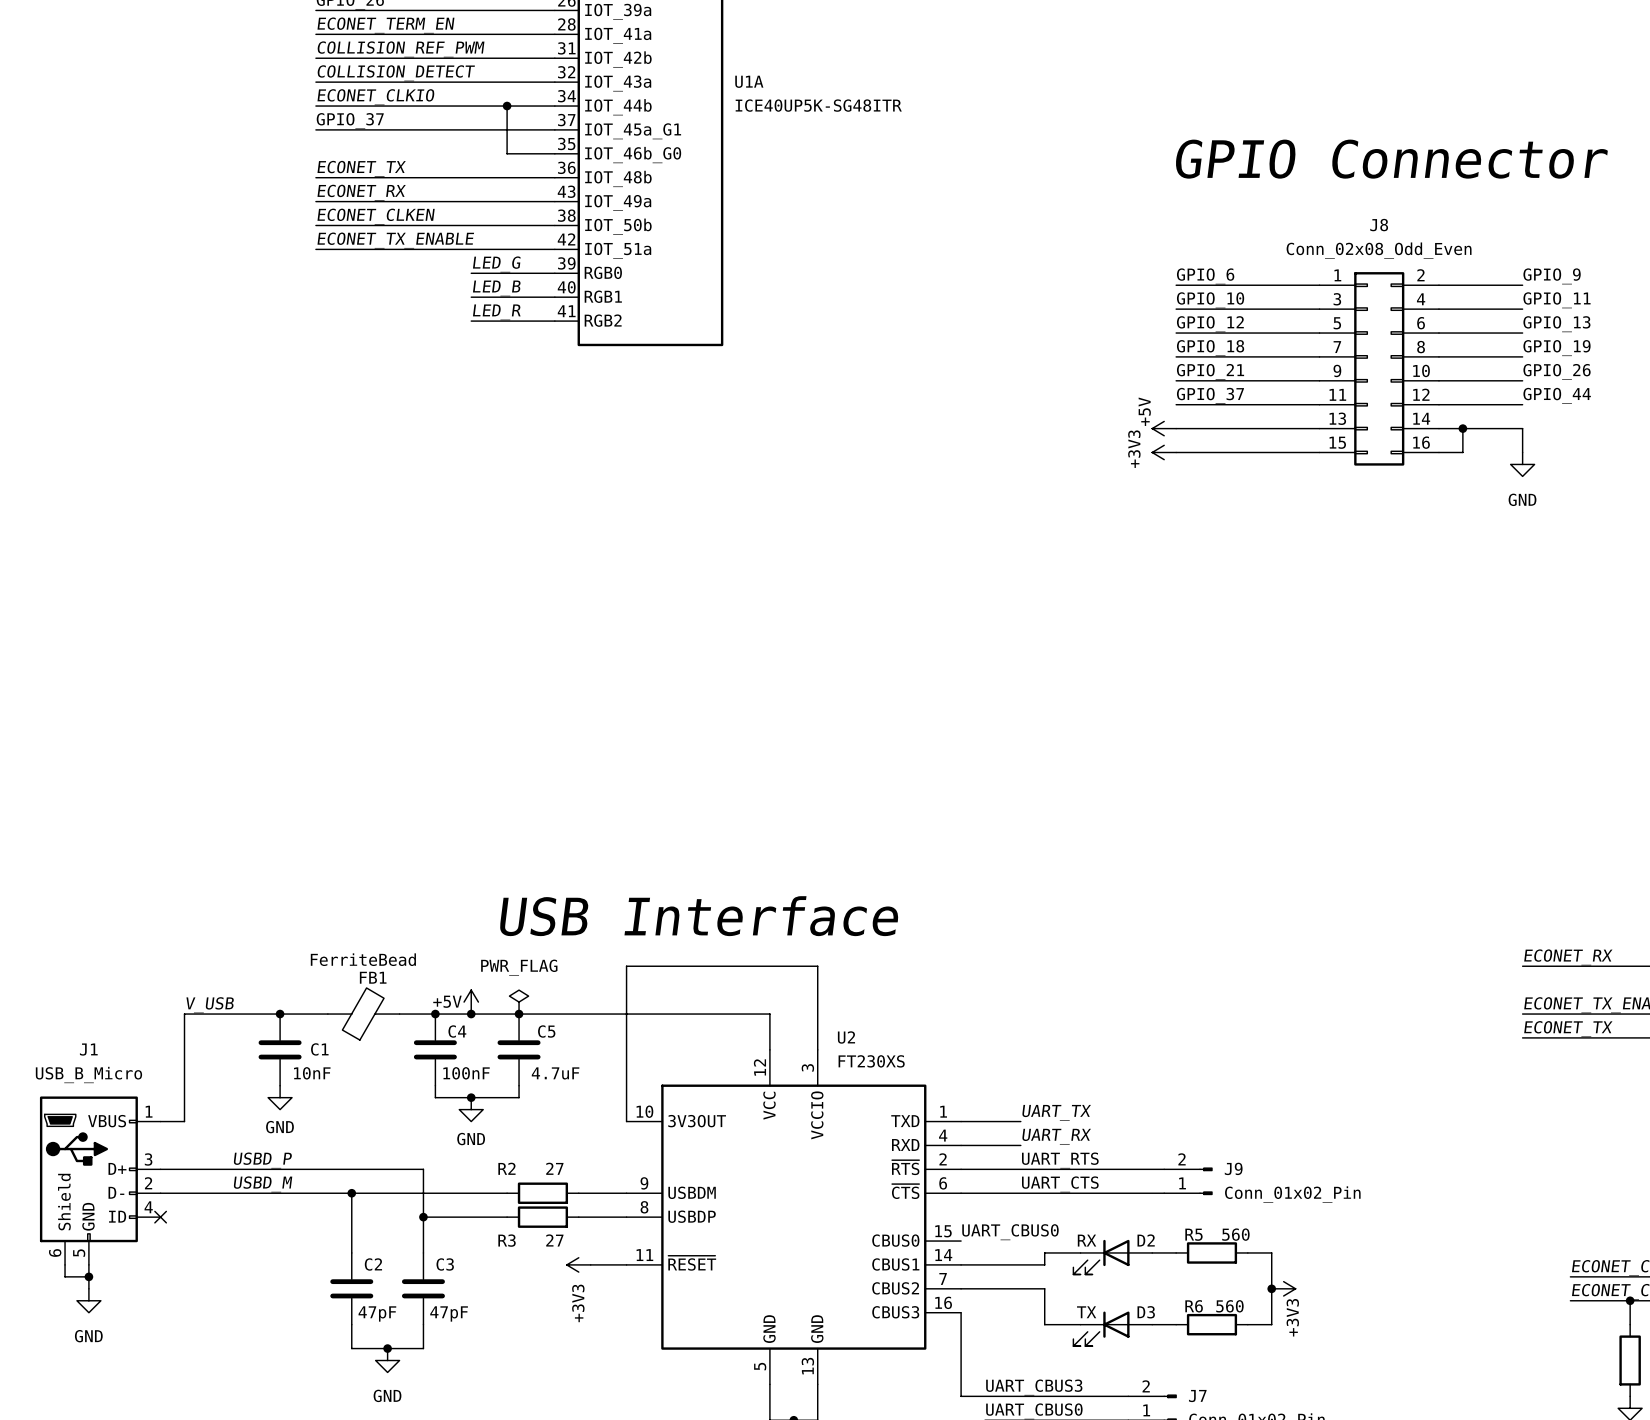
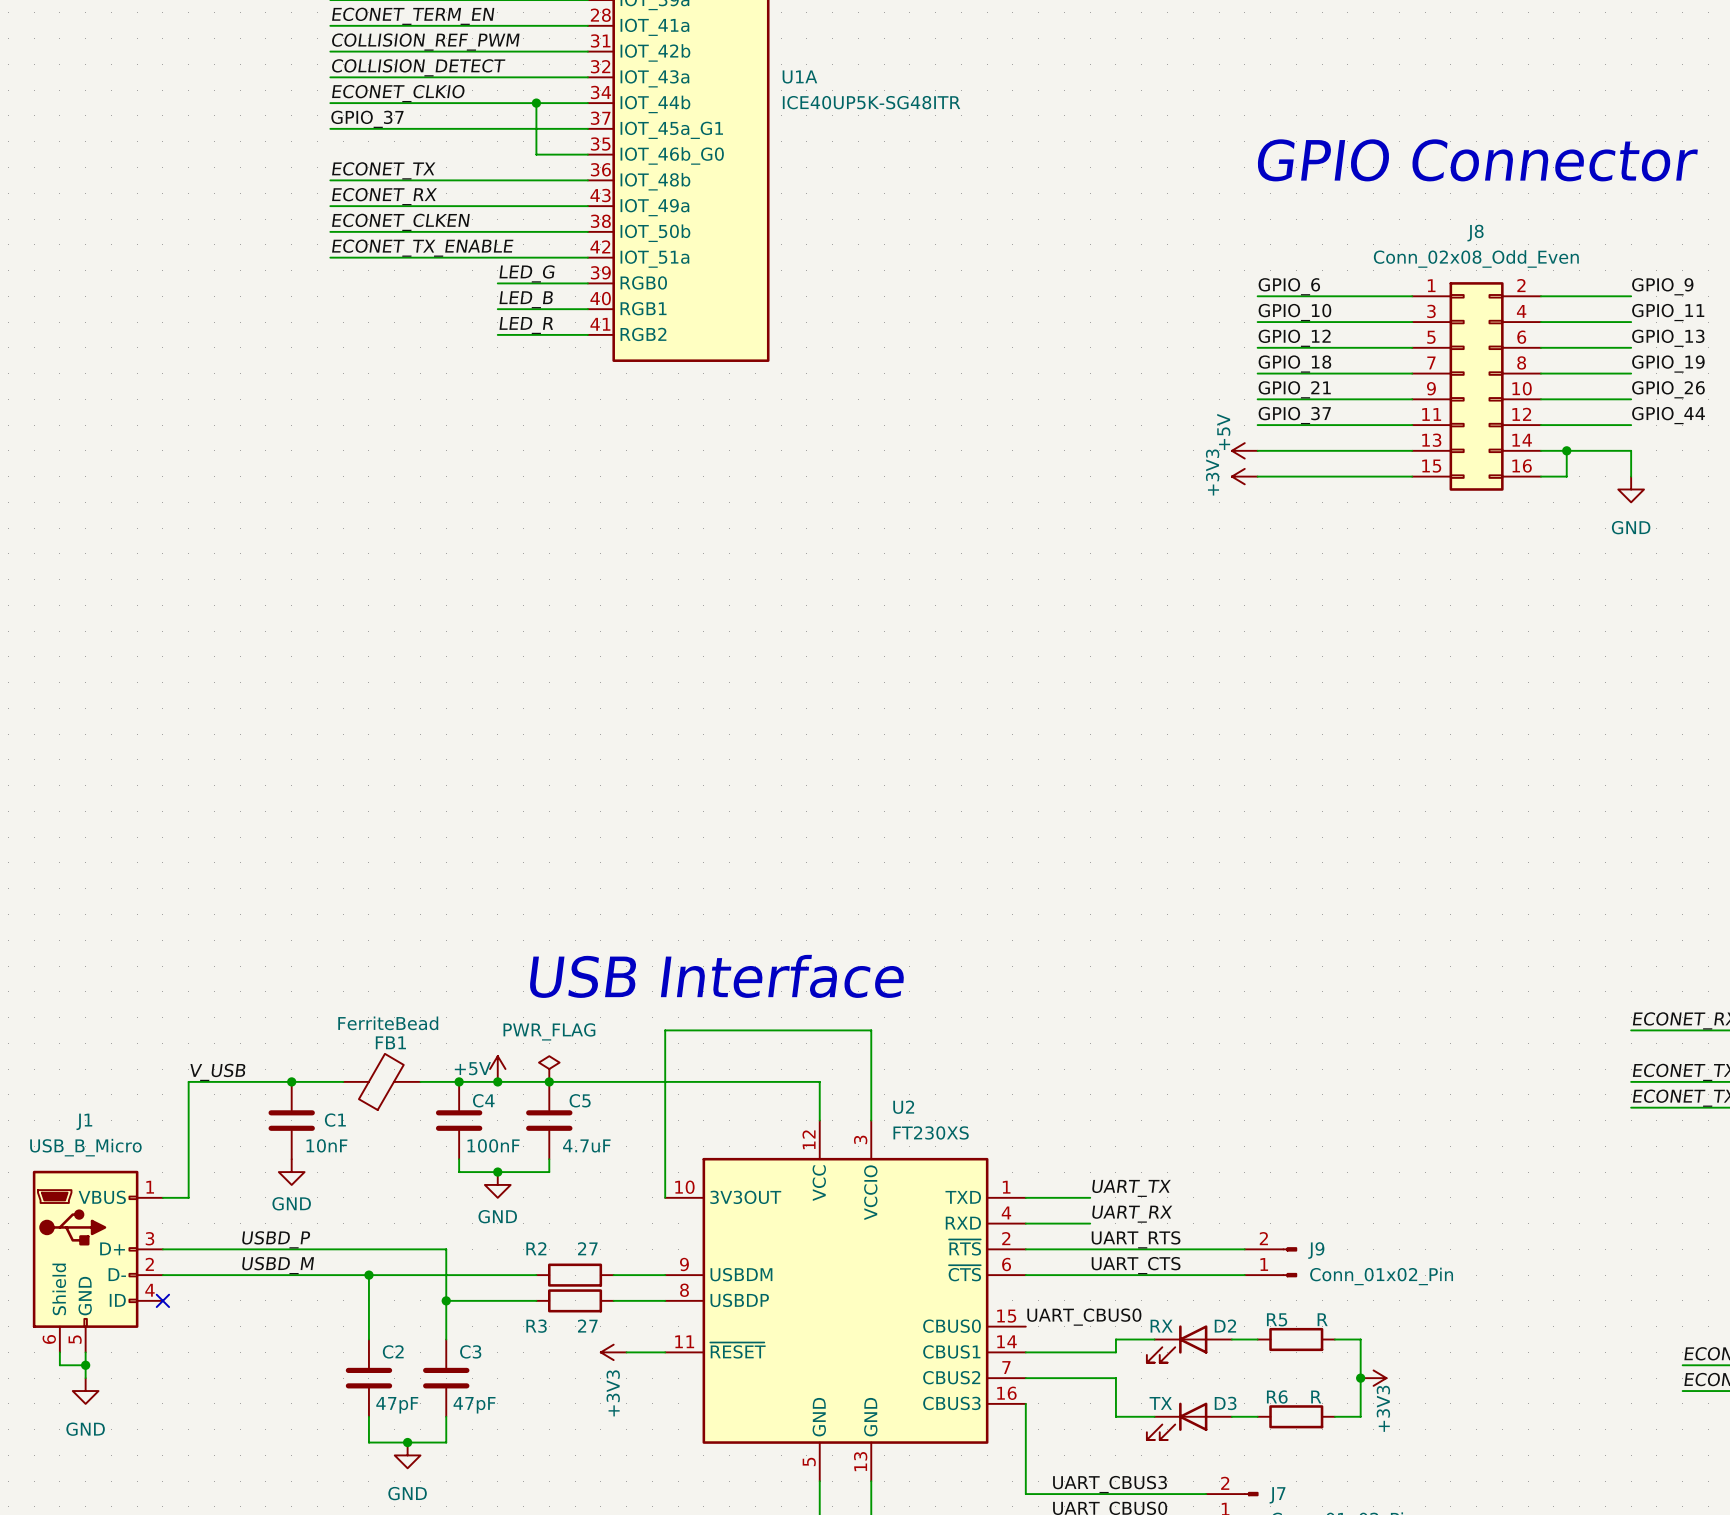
R5 value: 560 (1235, 1234) -> R (1322, 1319)
R6 value: 560 (1229, 1306) -> R (1316, 1396)

